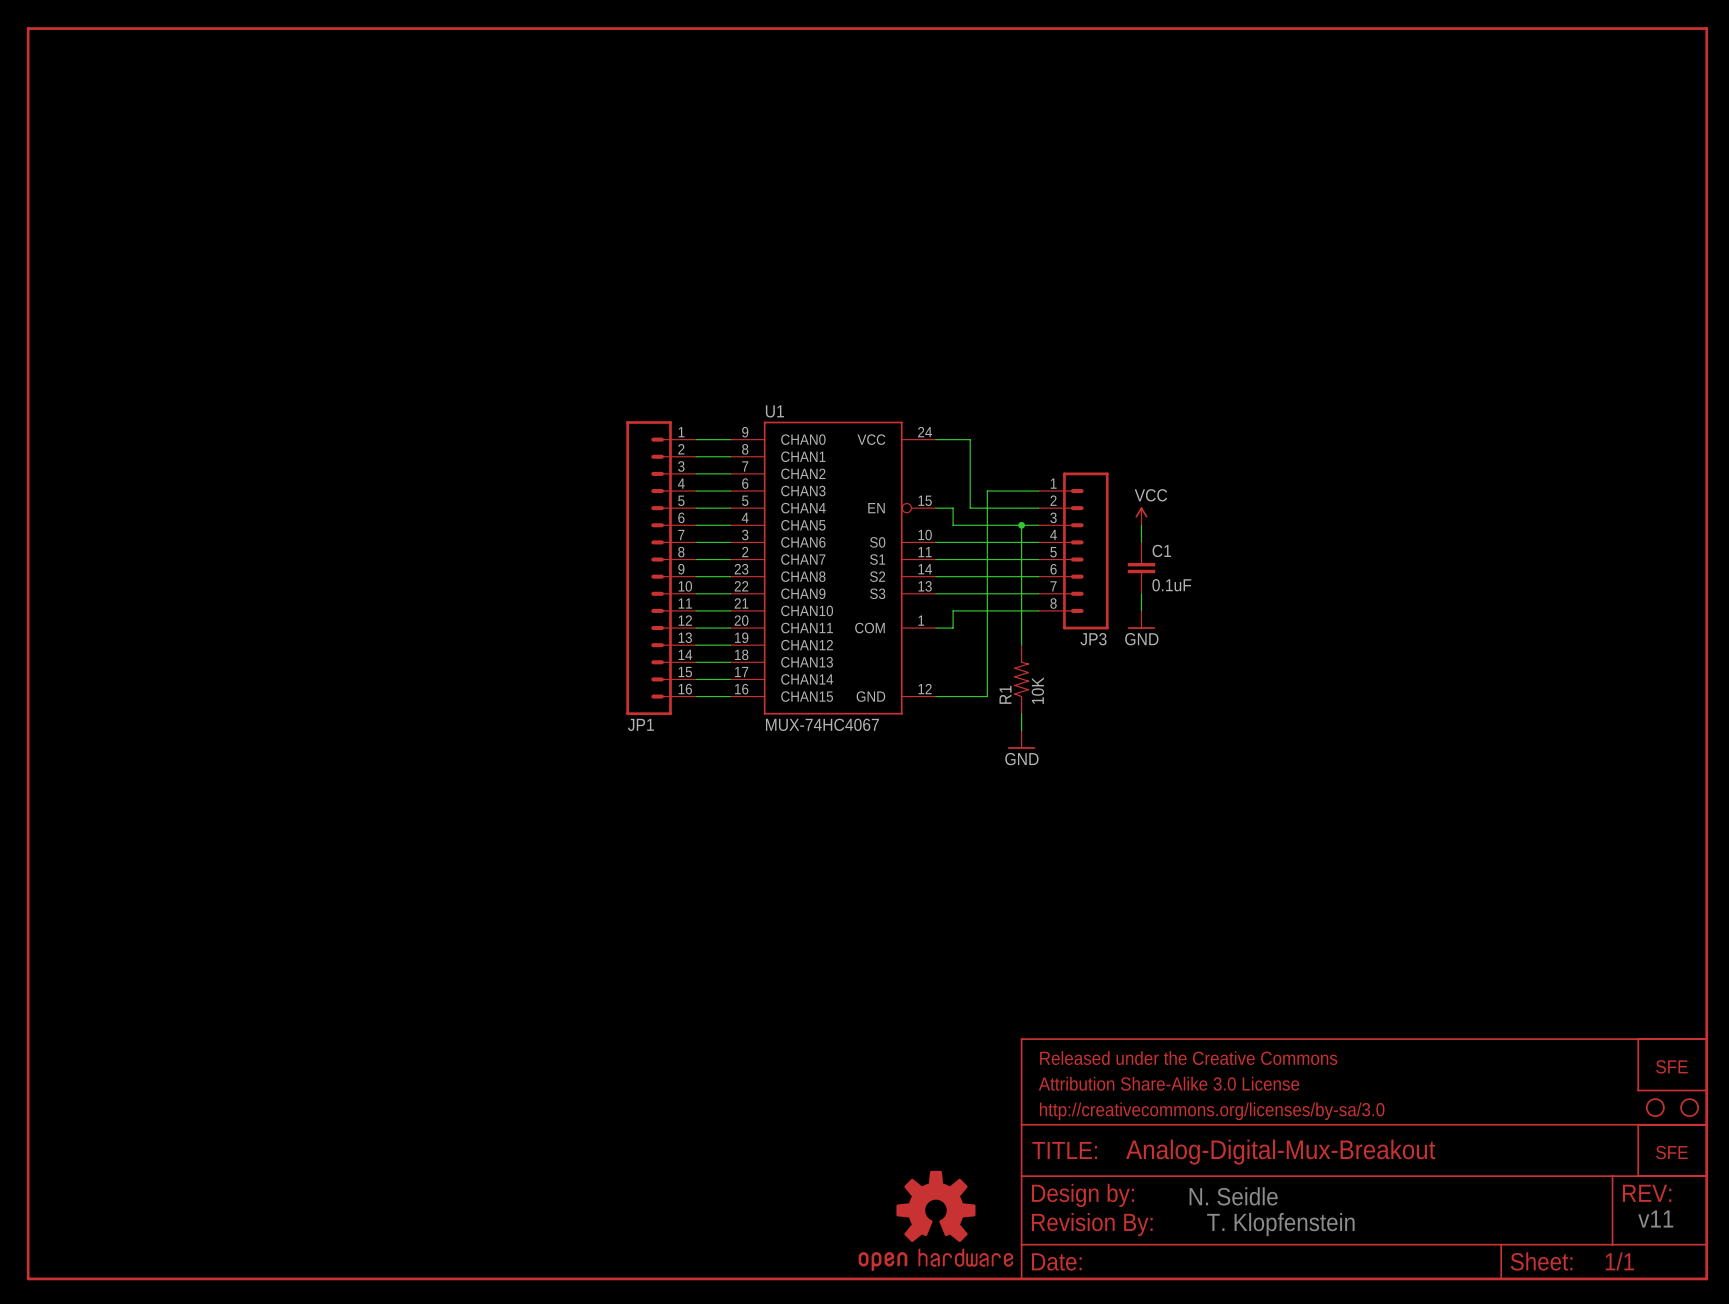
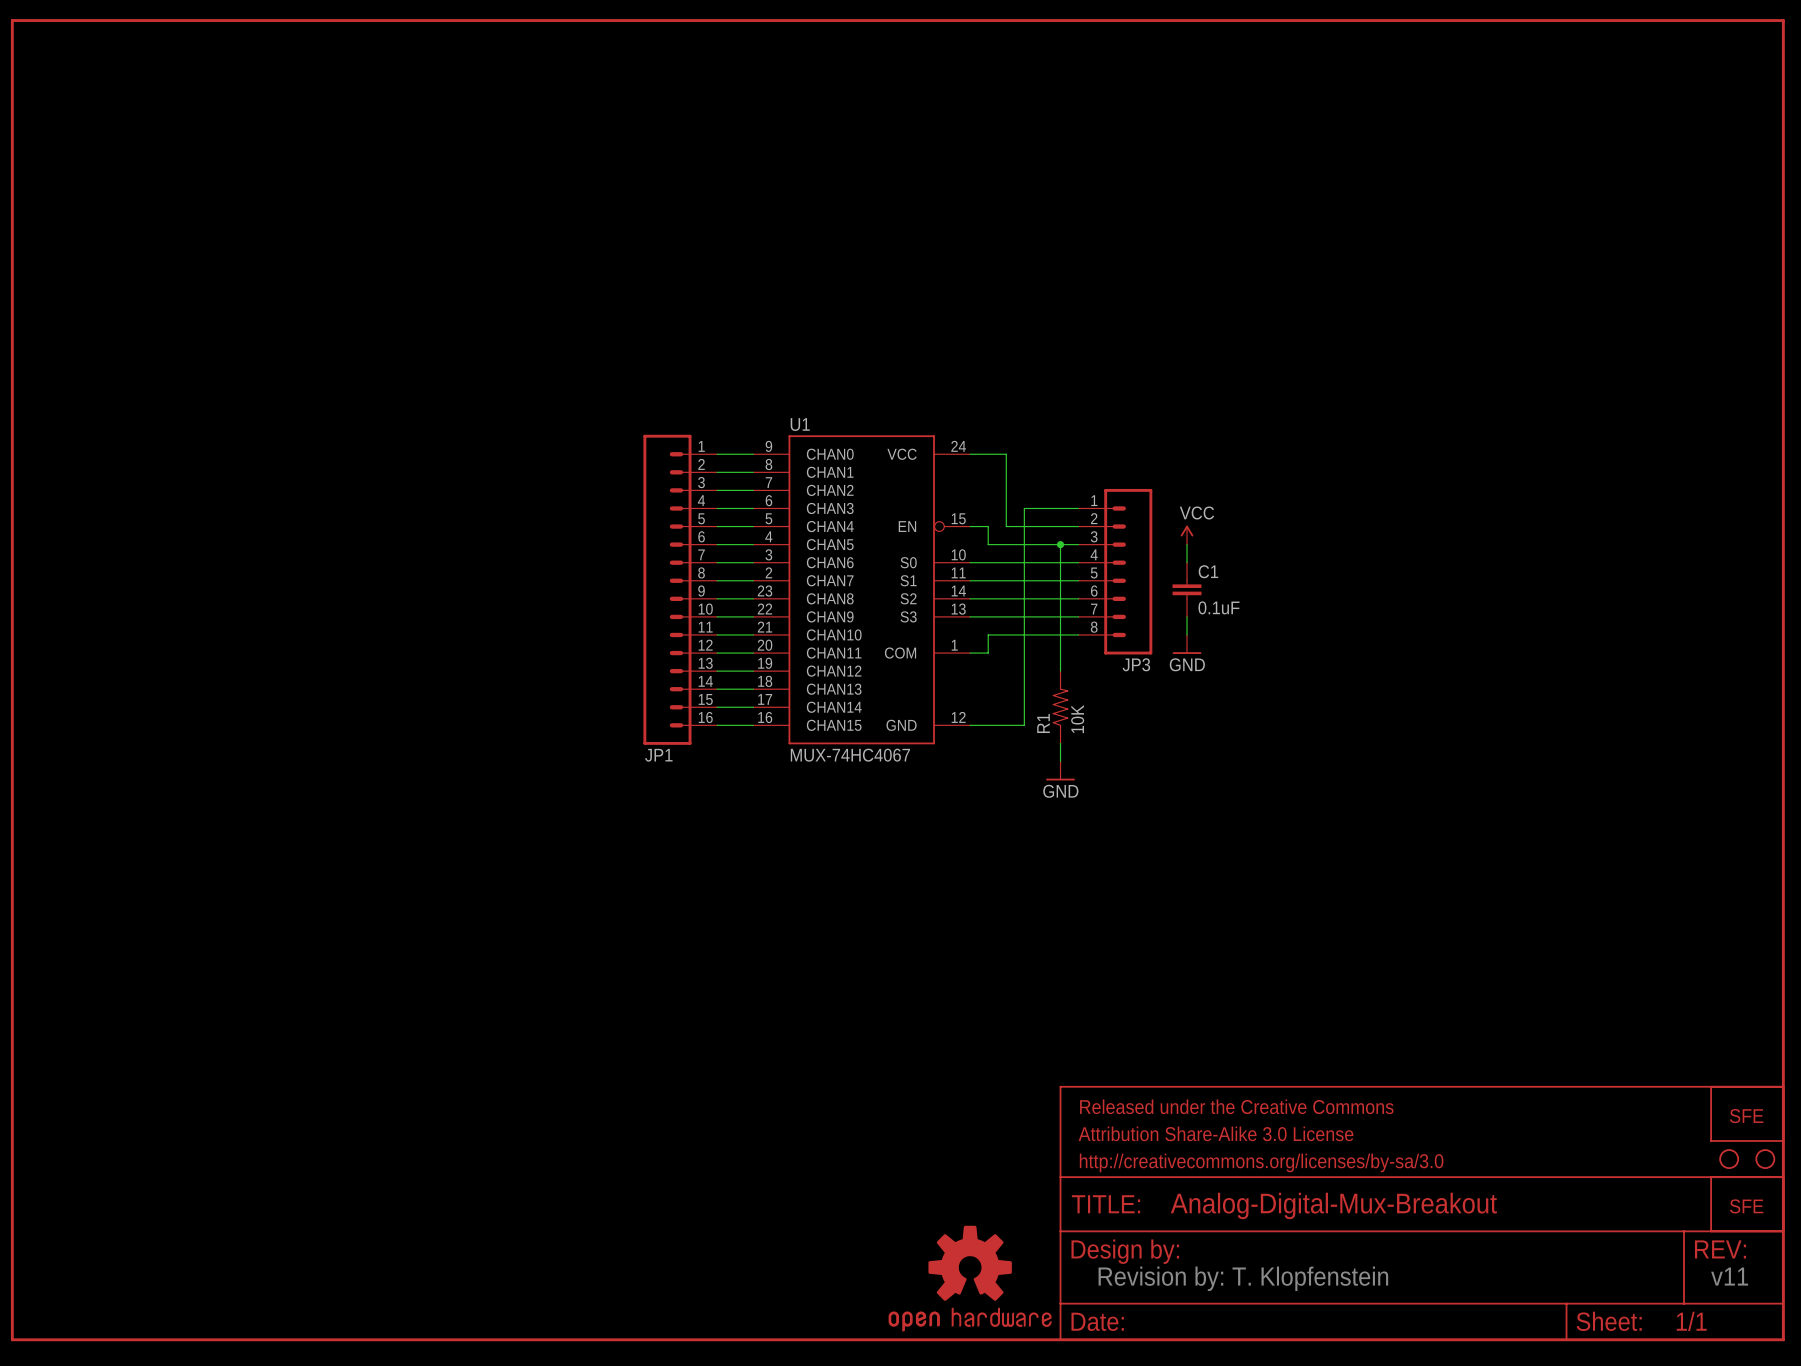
text: N. Seidle (1233, 1196) -> none
part: (1092, 1224) -> none
text: T. Klopfenstein (1280, 1224) -> Revision by: T. Klopfenstein (1243, 1278)

